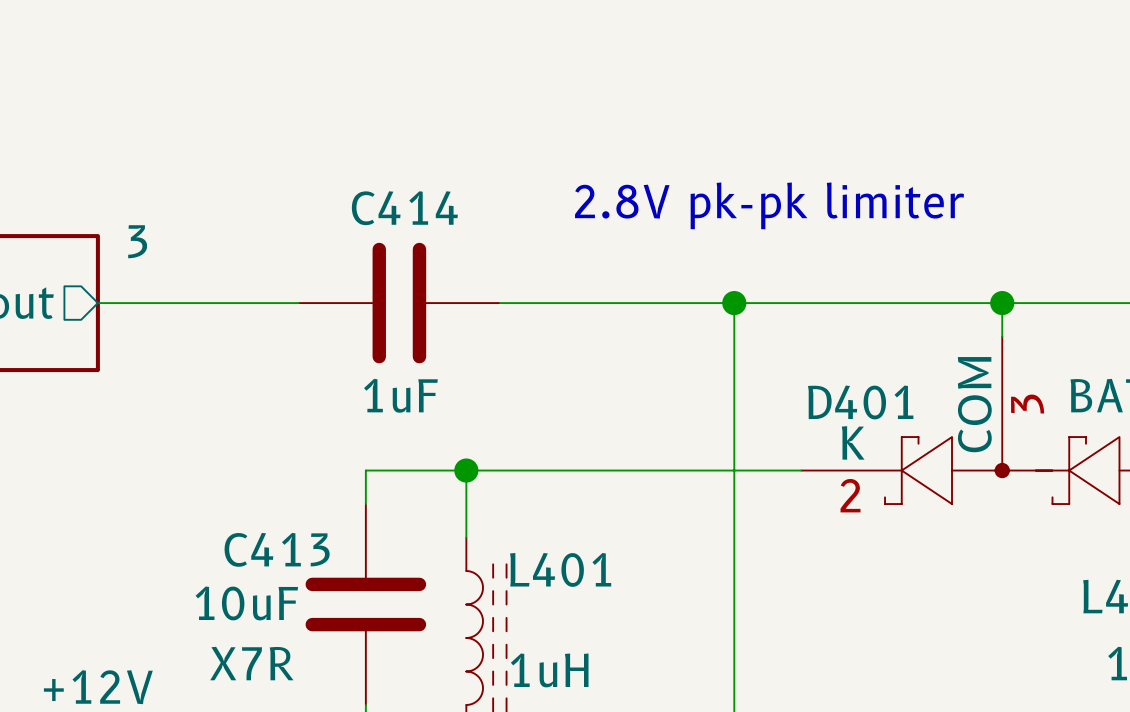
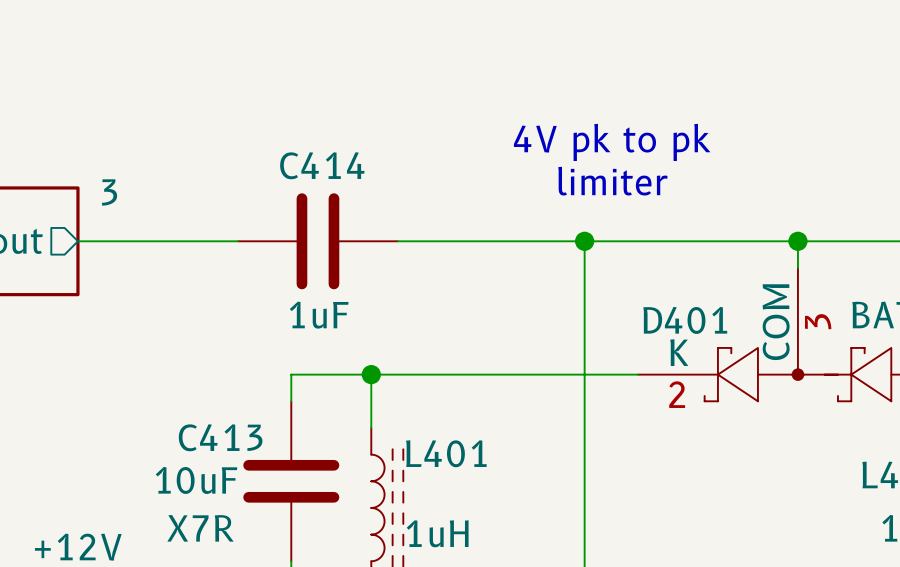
text: none -> 4V pk to pk (612, 142)
text: 2.8V pk-pk limiter (769, 205) -> none
text: none -> limiter (612, 181)

